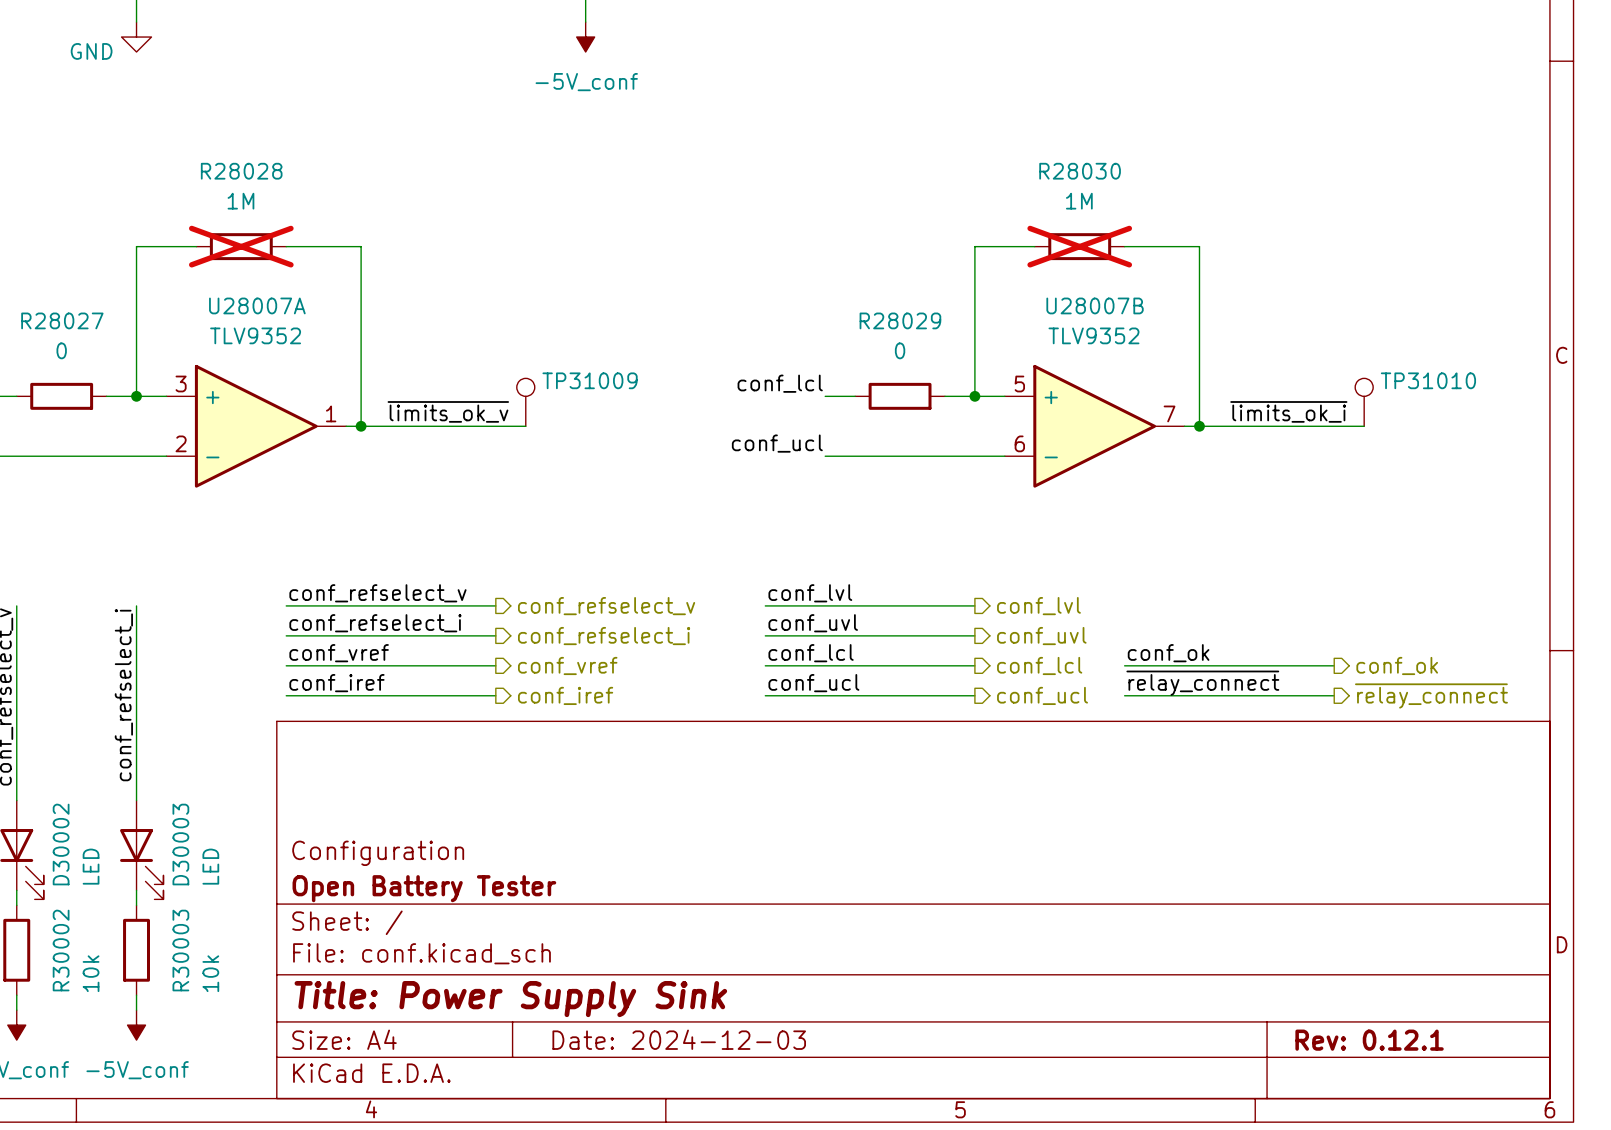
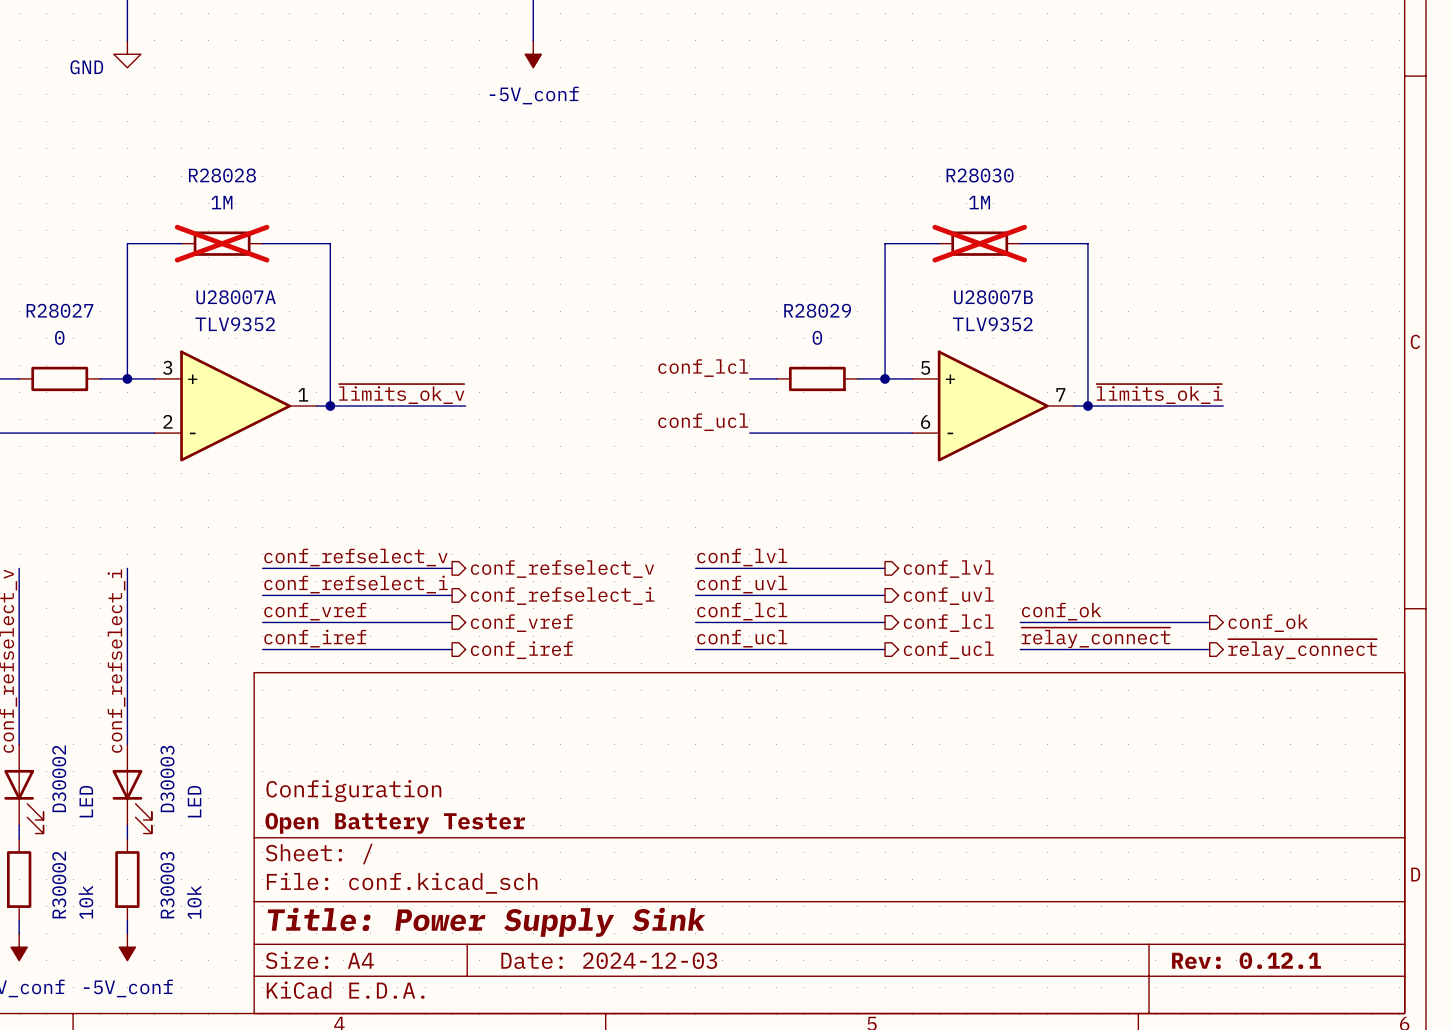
TP31009: (525, 402) -> none
TP31010: (1364, 402) -> none
wire: (510, 426) (525, 426) -> none
wire: (1349, 426) (1364, 426) -> none

